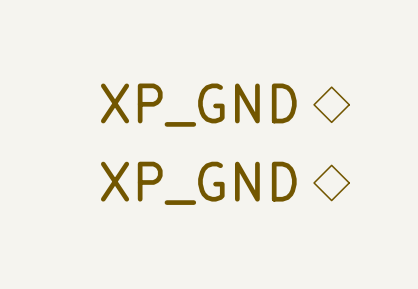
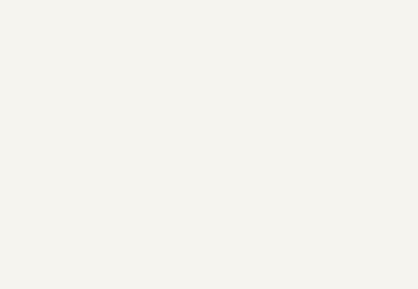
hierarchical label: XP_GND (198, 105) -> none
hierarchical label: XP_GND (198, 183) -> none

